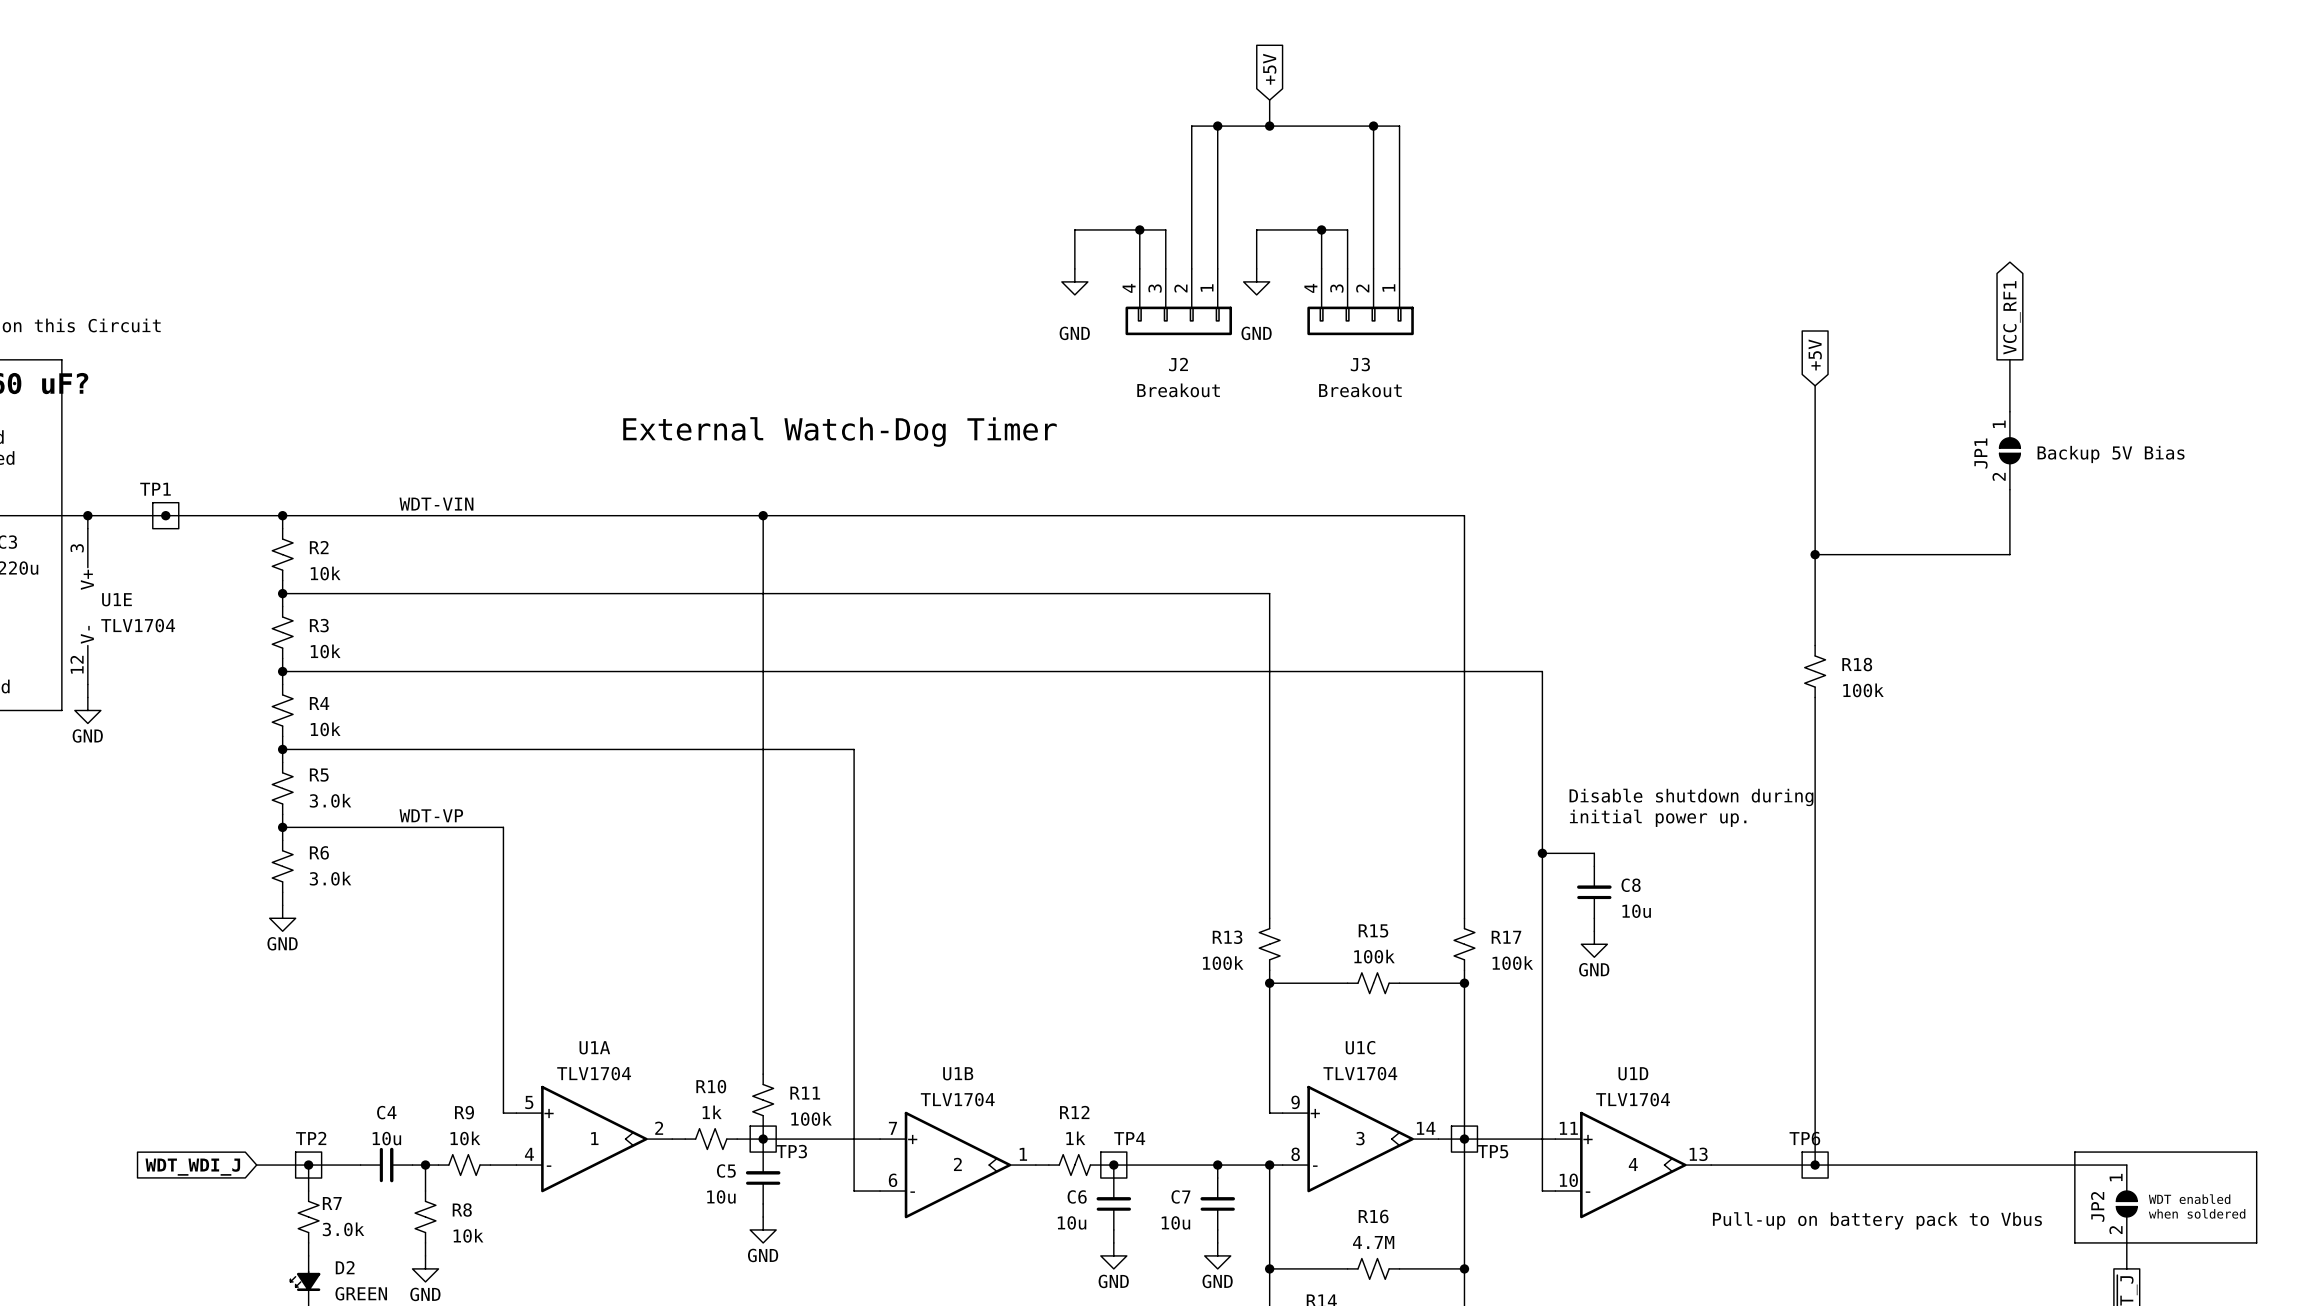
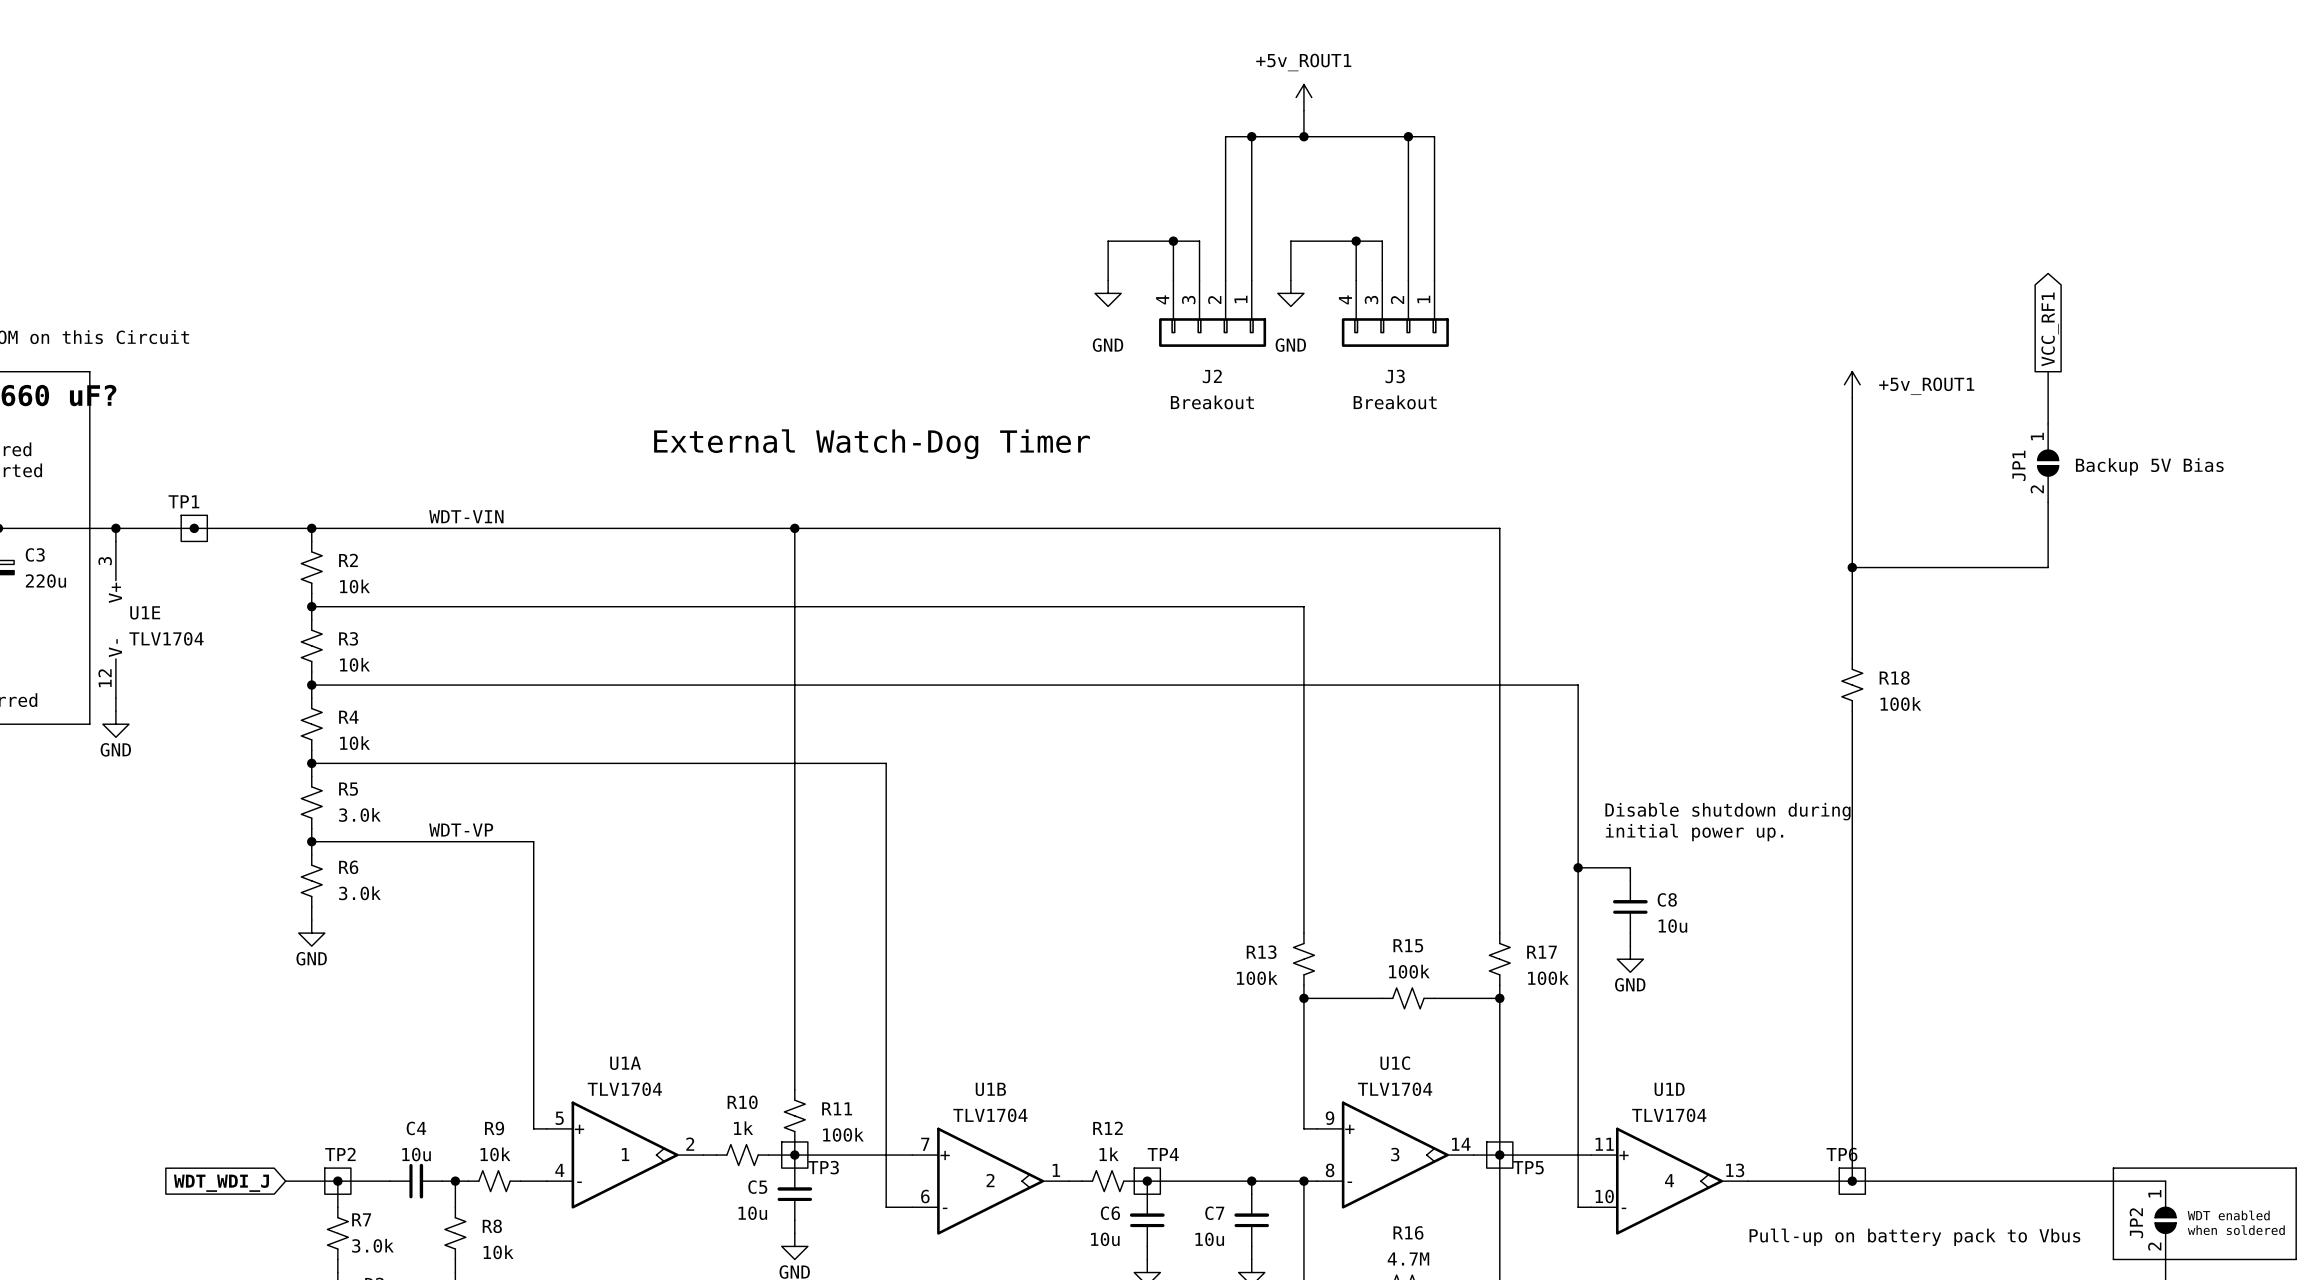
global label: +5V (1269, 69) -> none
power symbol: none -> +5v_ROUT1 (1303, 97)
global label: +5V (1815, 354) -> none
power symbol: none -> +5v_ROUT1 (1852, 384)

